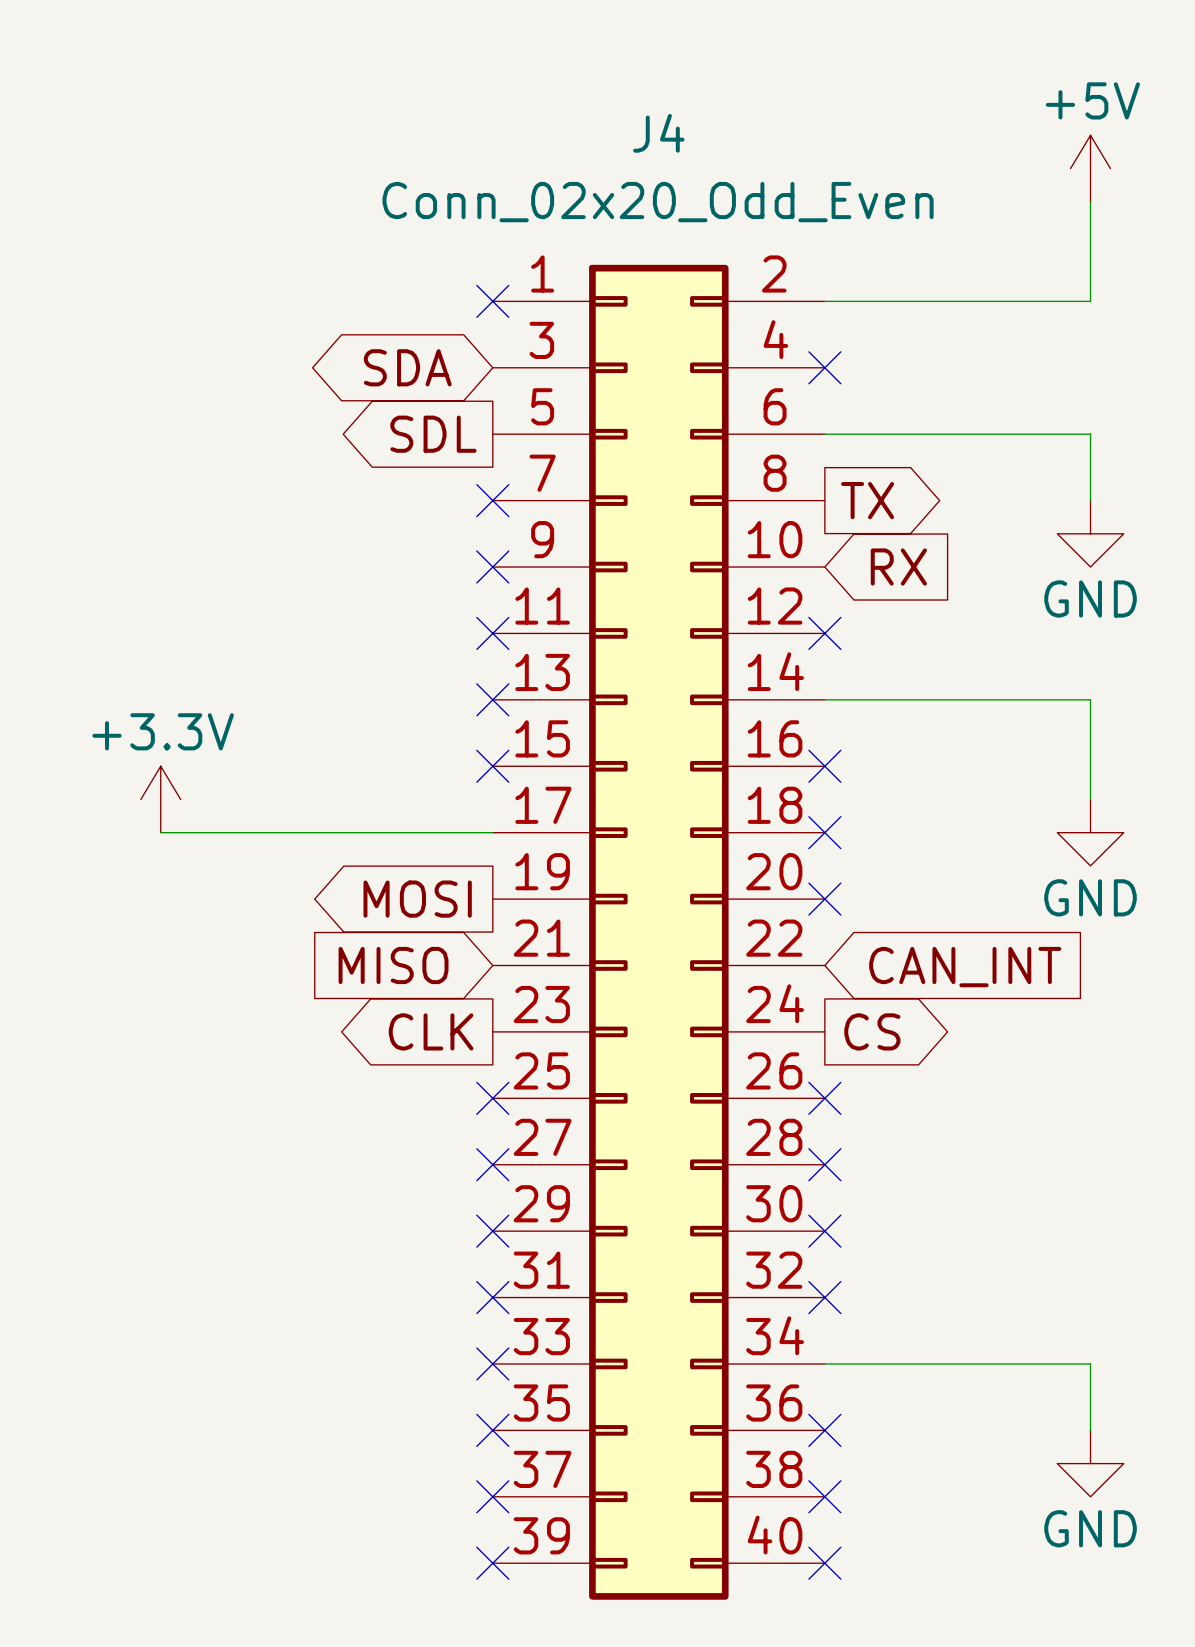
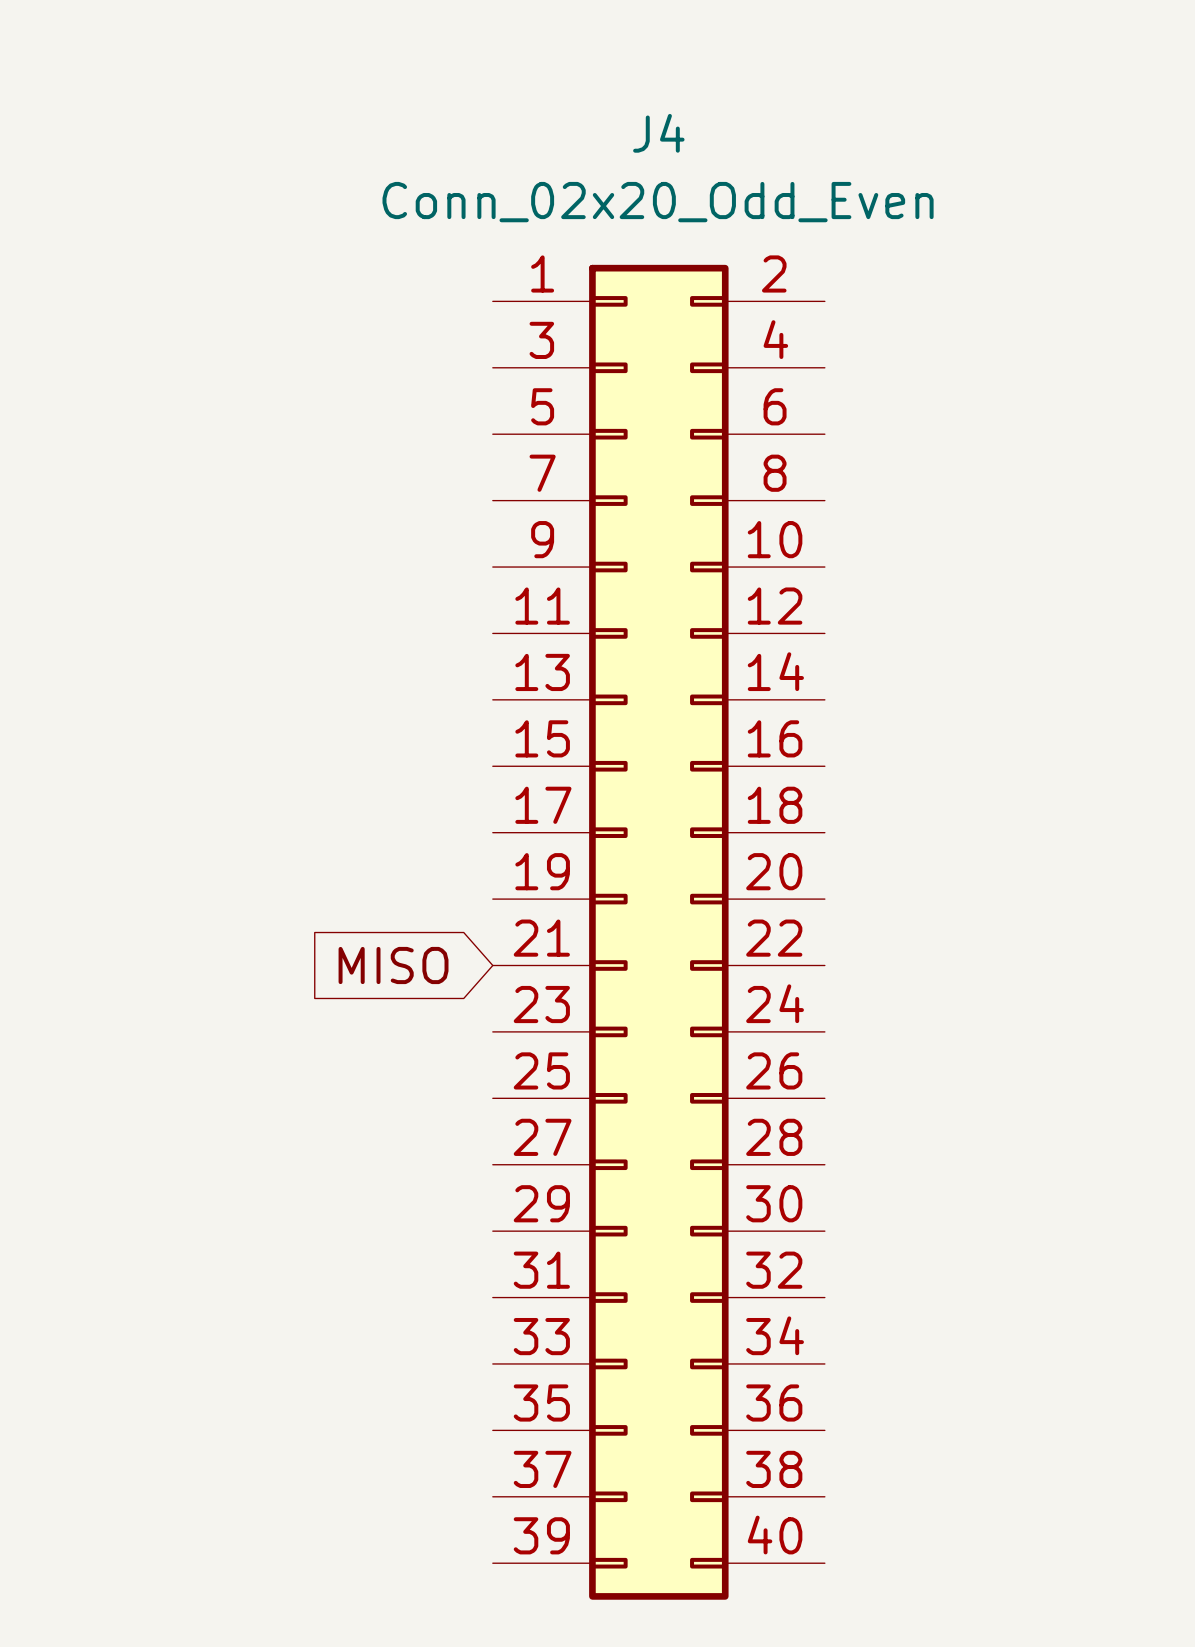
power symbol: +5V (1090, 168) -> none
wire: (1090, 201) (1090, 301) (824, 301) -> none
no-connect mark: (492, 301) -> none
global label: SDA (407, 367) -> none
no-connect mark: (824, 367) -> none
global label: SDL (433, 434) -> none
wire: (824, 434) (1090, 434) (1090, 500) -> none
no-connect mark: (492, 500) -> none
global label: TX (867, 500) -> none
power symbol: GND (1090, 533) -> none
no-connect mark: (492, 567) -> none
global label: RX (898, 567) -> none
no-connect mark: (492, 633) -> none
no-connect mark: (824, 633) -> none
no-connect mark: (492, 699) -> none
wire: (824, 699) (1090, 699) (1090, 799) -> none
no-connect mark: (492, 766) -> none
no-connect mark: (824, 766) -> none
power symbol: +3.3V (160, 799) -> none
wire: (160, 832) (492, 832) -> none
no-connect mark: (824, 832) -> none
power symbol: GND (1090, 832) -> none
global label: MOSI (417, 899) -> none
no-connect mark: (824, 899) -> none
global label: CAN_INT (965, 967) -> none
global label: CLK (431, 1031) -> none
global label: CS (872, 1031) -> none
no-connect mark: (492, 1098) -> none
no-connect mark: (824, 1098) -> none
no-connect mark: (492, 1164) -> none
no-connect mark: (824, 1164) -> none
no-connect mark: (492, 1231) -> none
no-connect mark: (824, 1231) -> none
no-connect mark: (492, 1297) -> none
no-connect mark: (824, 1297) -> none
no-connect mark: (492, 1363) -> none
wire: (824, 1363) (1090, 1363) (1090, 1430) -> none
no-connect mark: (492, 1430) -> none
no-connect mark: (824, 1430) -> none
power symbol: GND (1090, 1463) -> none
no-connect mark: (492, 1496) -> none
no-connect mark: (824, 1496) -> none
no-connect mark: (492, 1563) -> none
no-connect mark: (824, 1563) -> none

